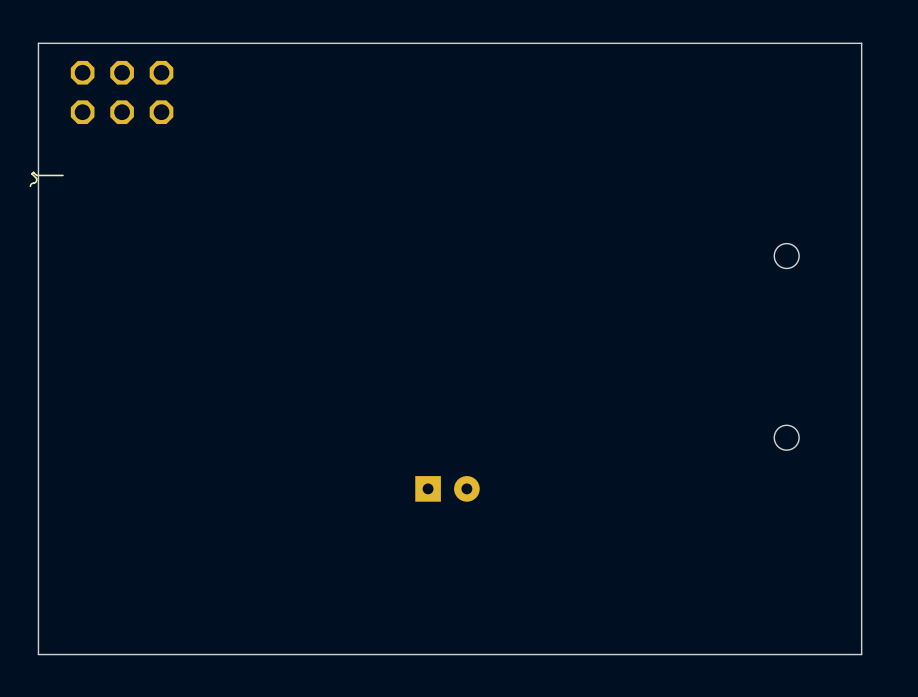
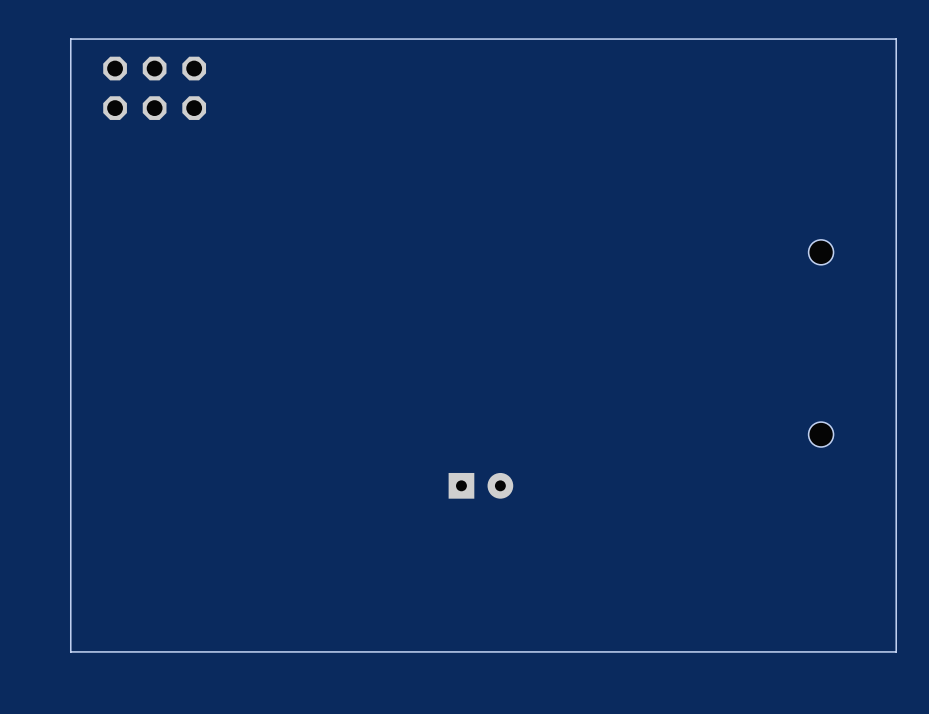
part: (46, 179) -> none

